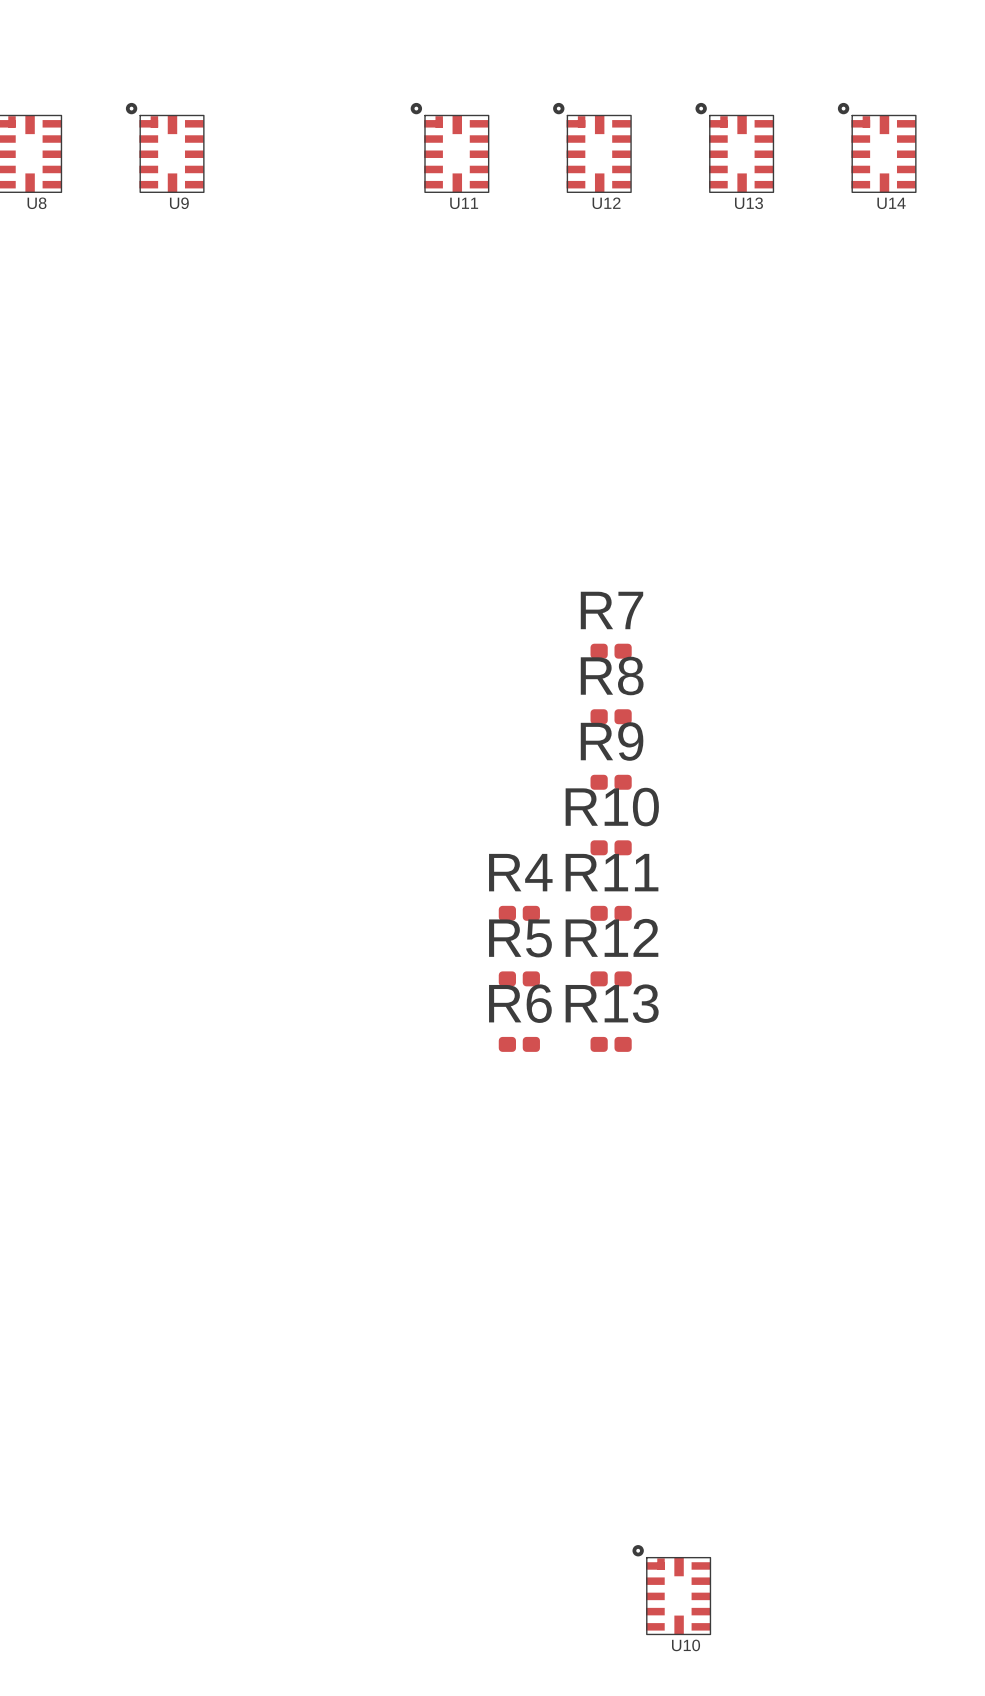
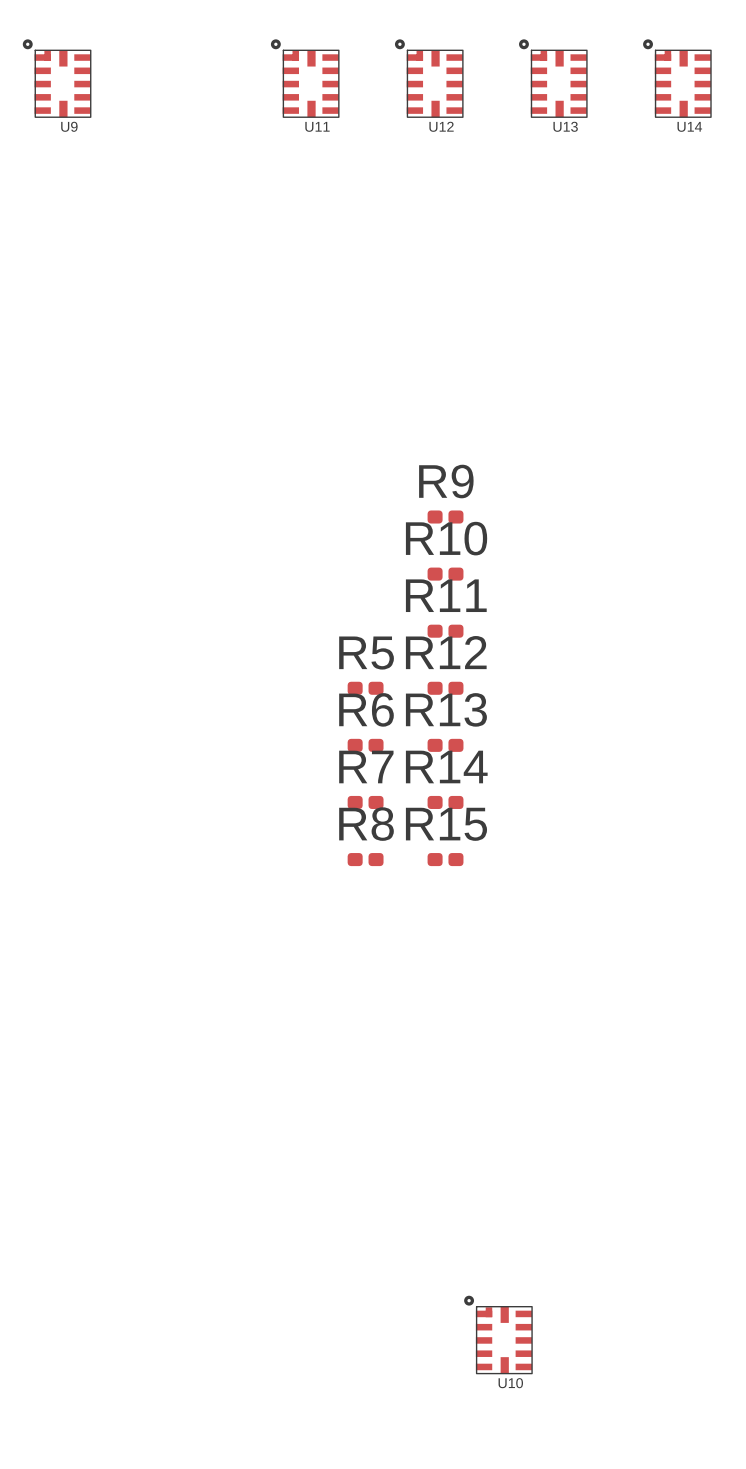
R7 name: R7 (611, 610) -> R9 (446, 481)
R8 name: R8 (612, 676) -> R10 (446, 538)
R9 name: R9 (612, 741) -> R11 (446, 595)
R10 name: R10 (612, 807) -> R12 (446, 652)
R5: none -> (365, 688)
R4 name: R4 (520, 872) -> R6 (366, 709)
R11 name: R11 (612, 872) -> R13 (446, 709)
R12 name: R12 (611, 937) -> R14 (446, 766)
R5 name: R5 (520, 938) -> R7 (366, 766)
R6 name: R6 (520, 1003) -> R8 (366, 824)
R13 name: R13 (612, 1003) -> R15 (446, 824)

